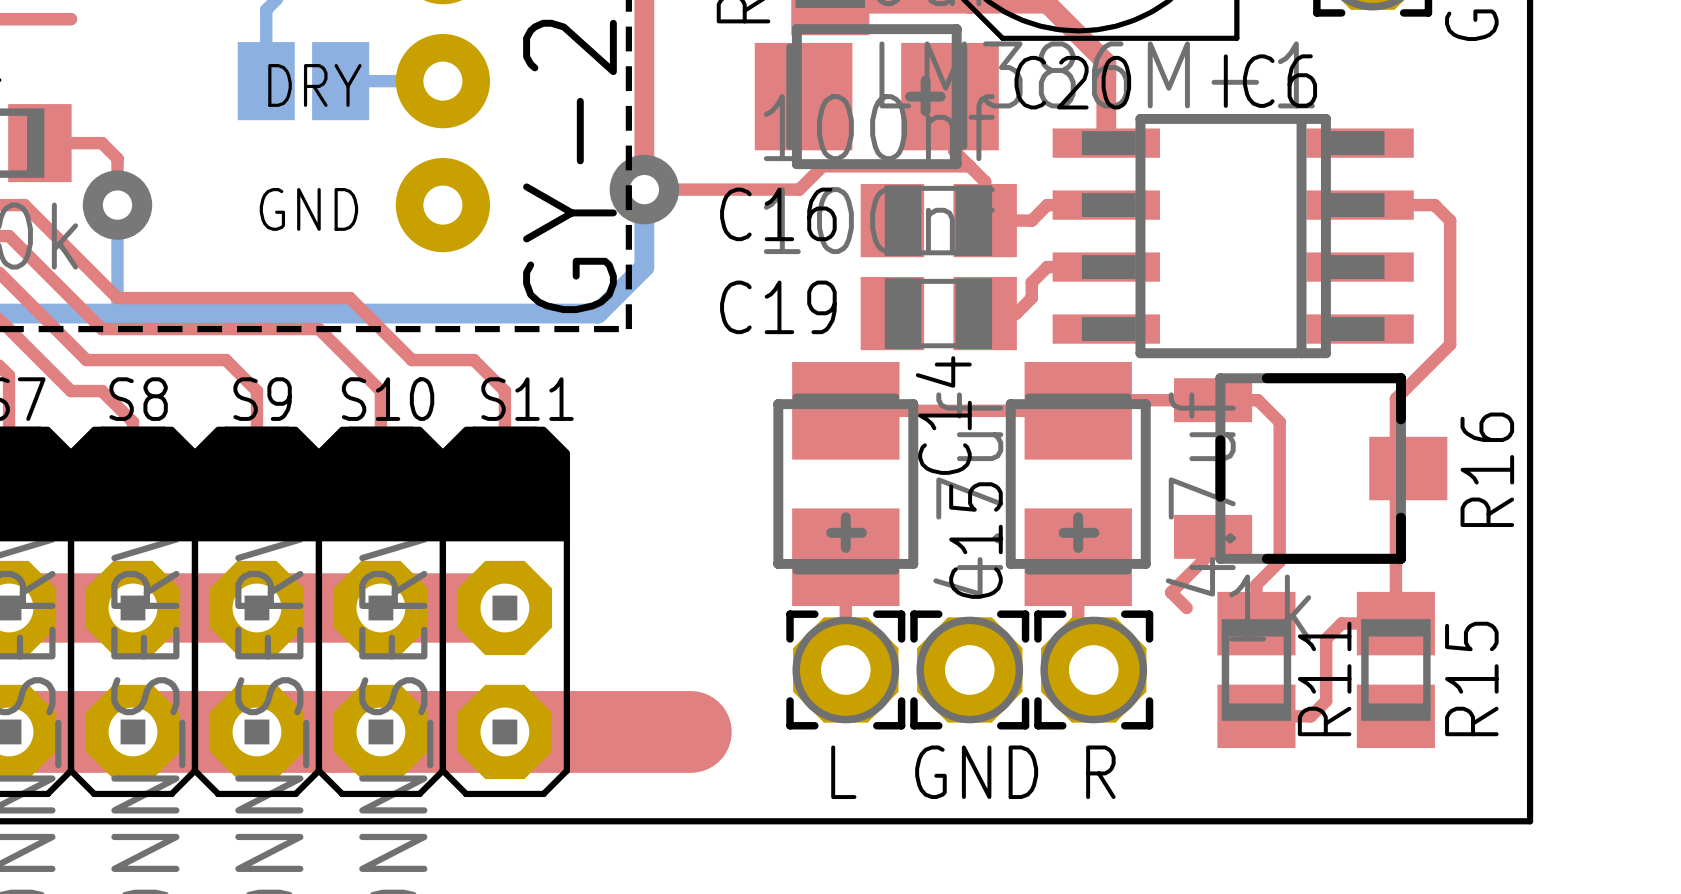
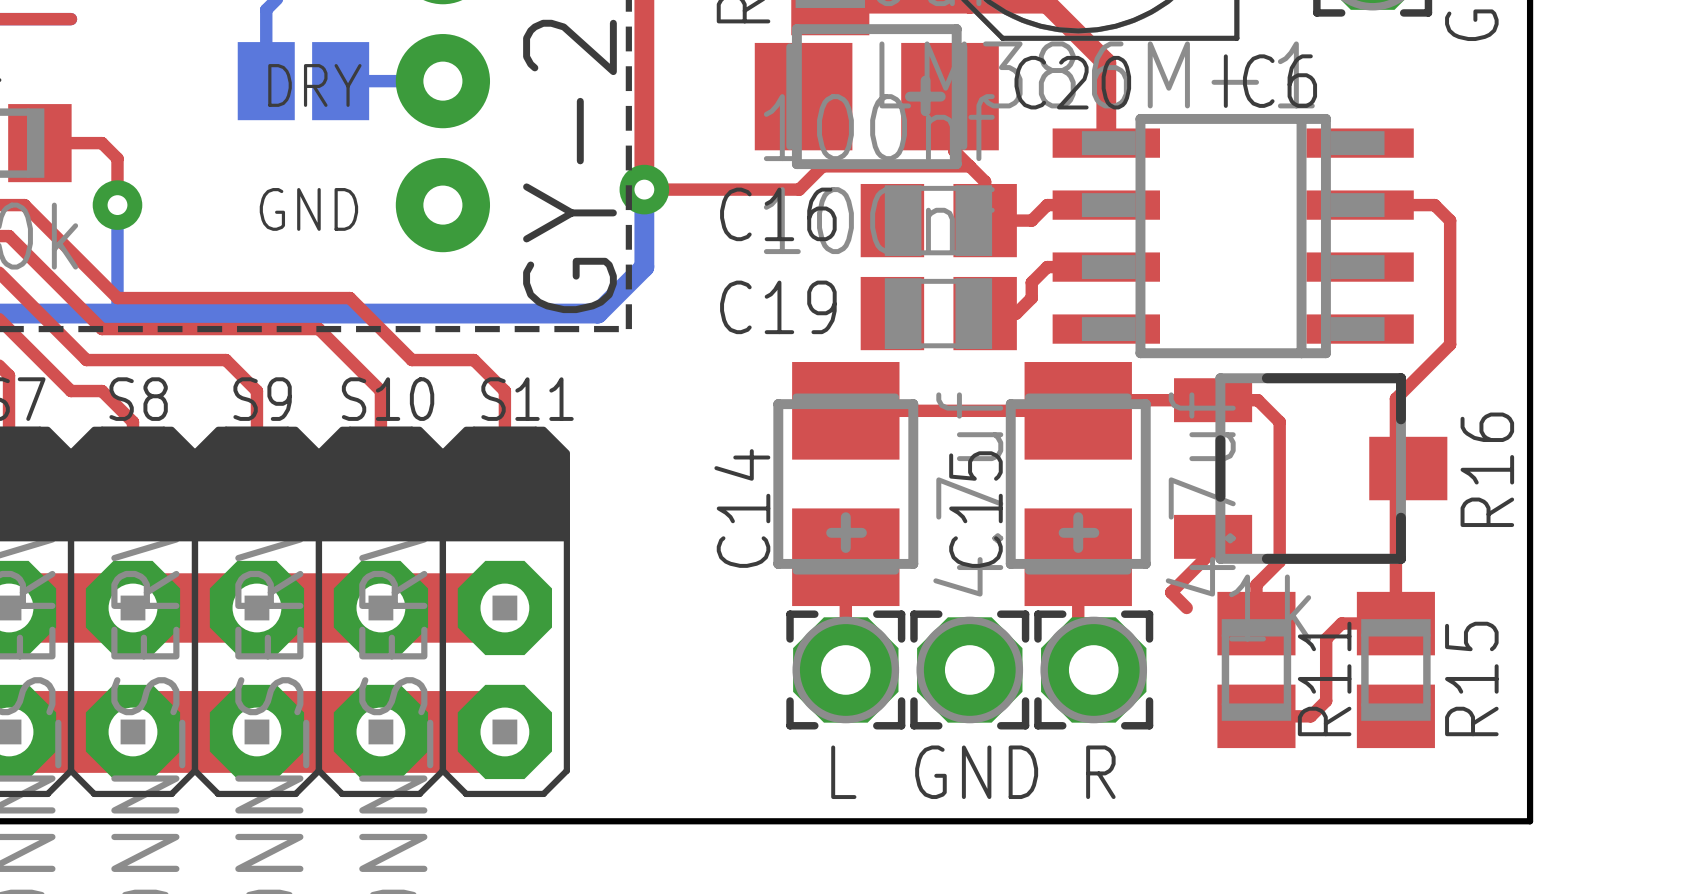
via size: [609, 154, 680, 225] -> [619, 164, 670, 215]
via size: [82, 170, 153, 240] -> [92, 180, 143, 230]
C14 name position: C14 (943, 415) -> C14 (742, 508)
C15 name position: C15 (975, 540) -> C15 (975, 509)
top track: (504, 731) (690, 731) -> none

